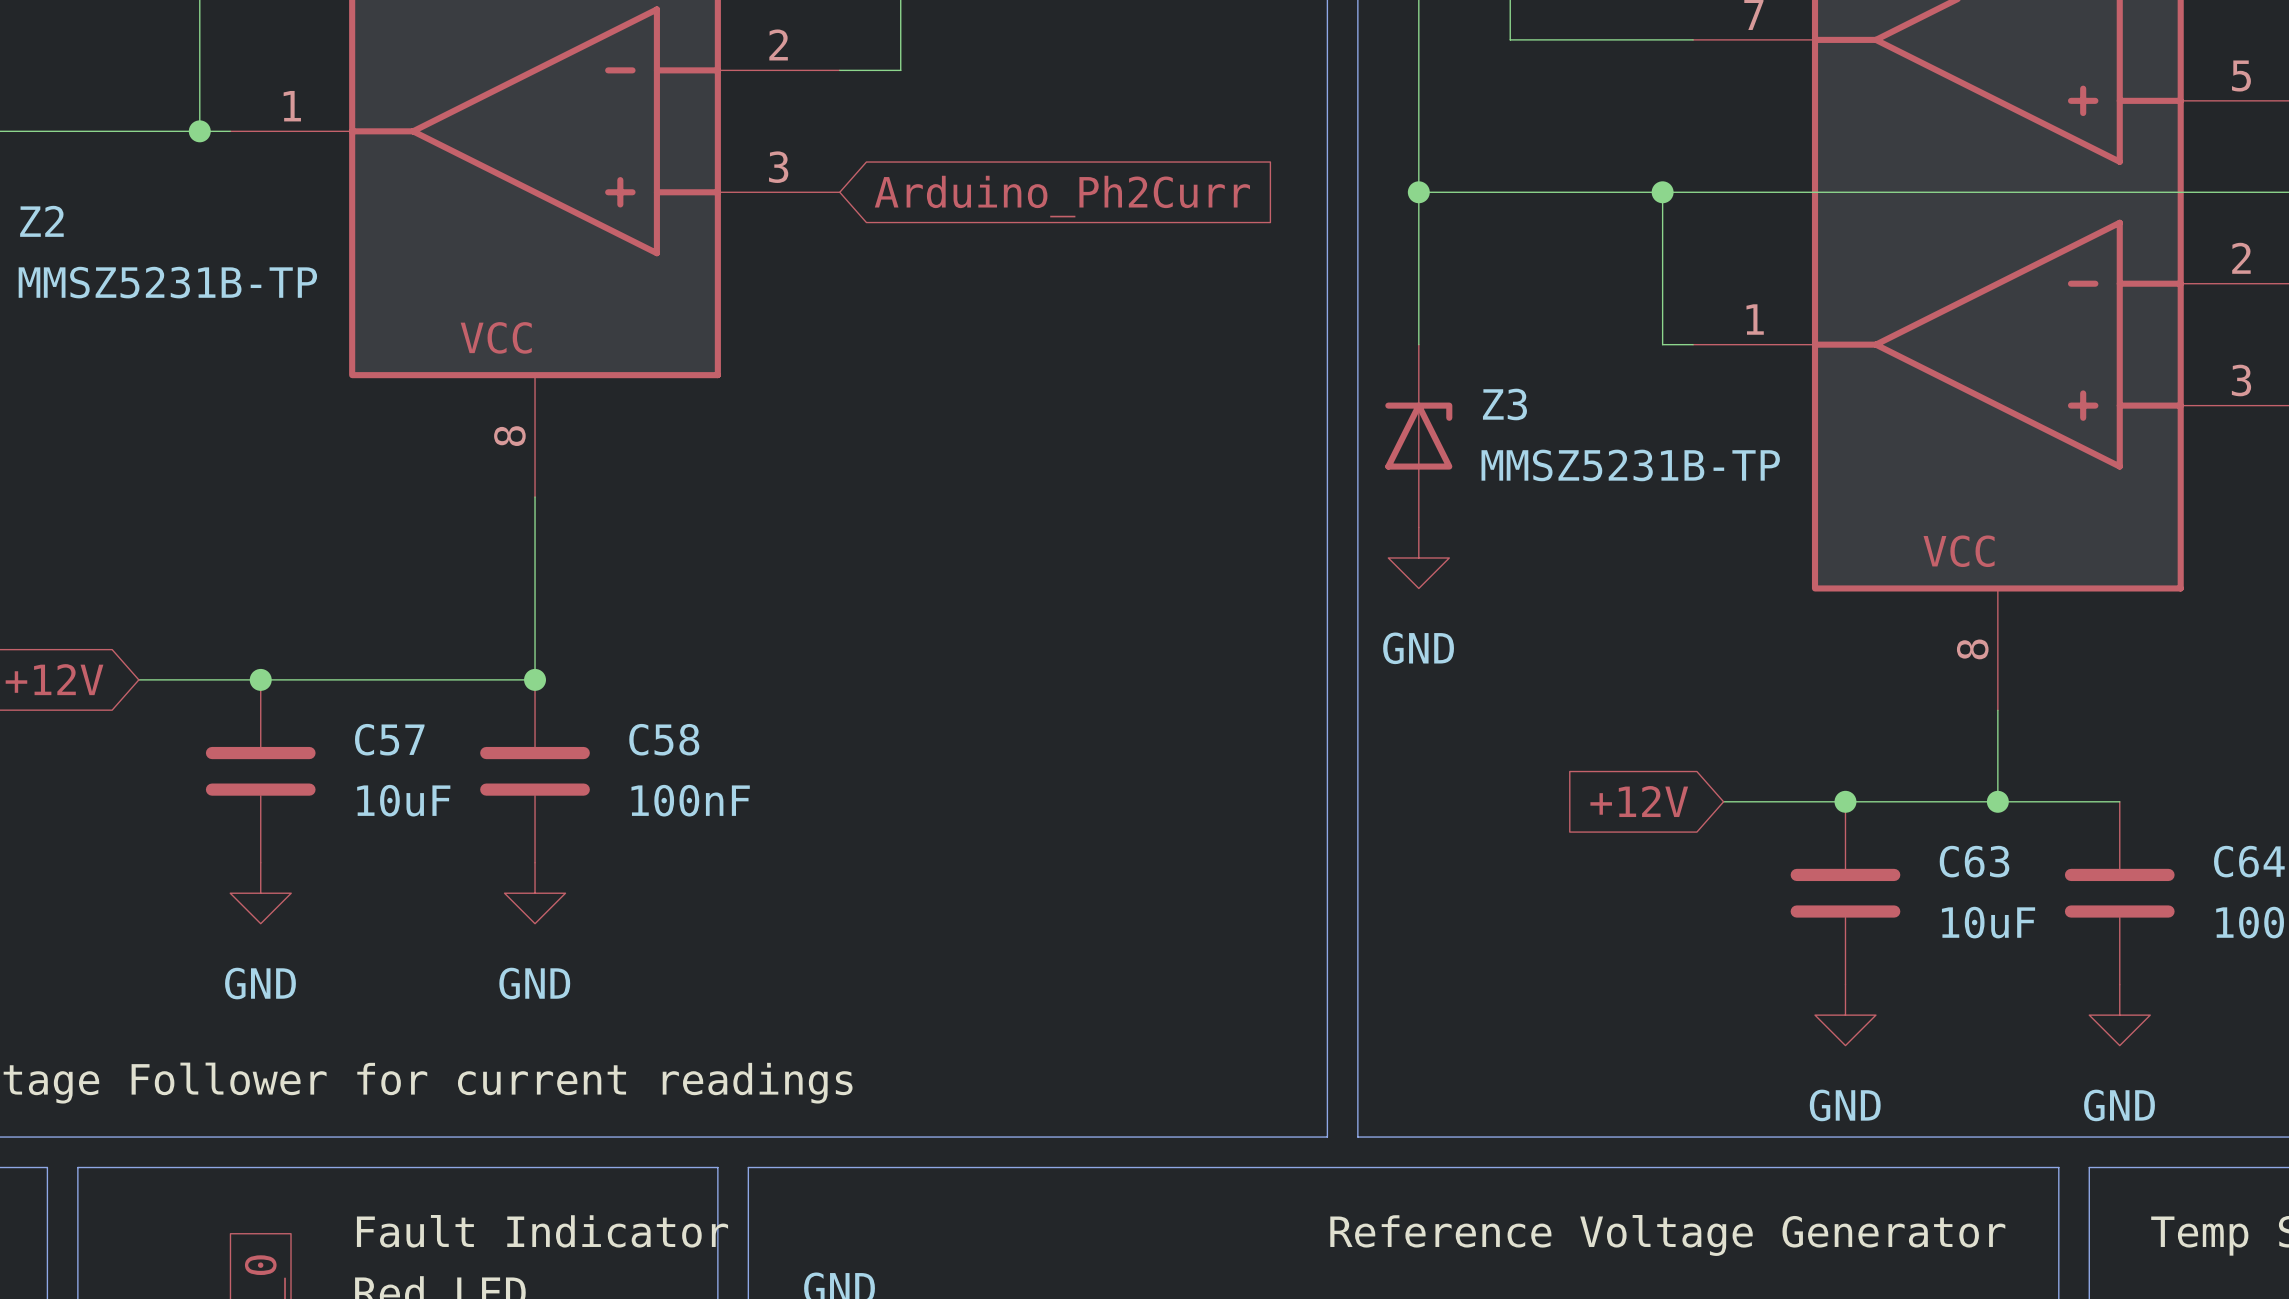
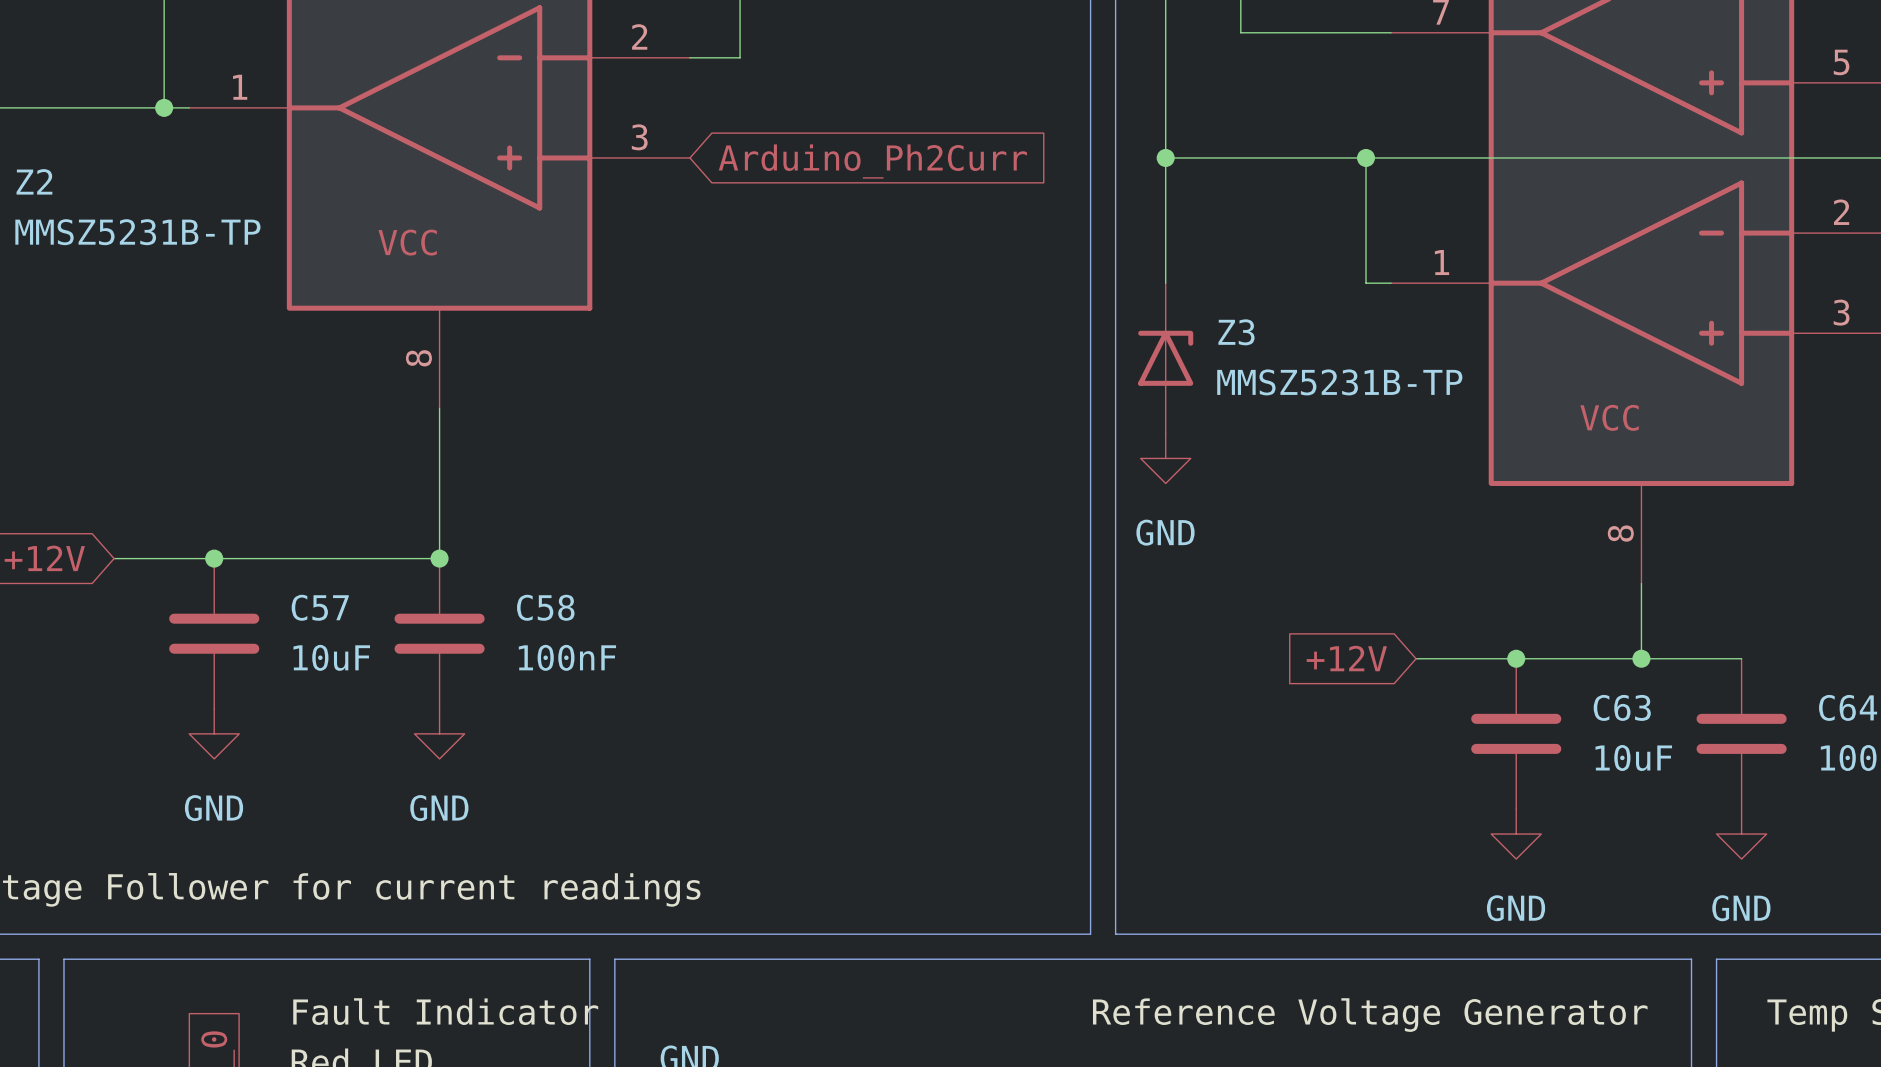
part text position: VCC (496, 337) -> VCC (407, 242)
part text position: VCC (1959, 551) -> VCC (1609, 417)

